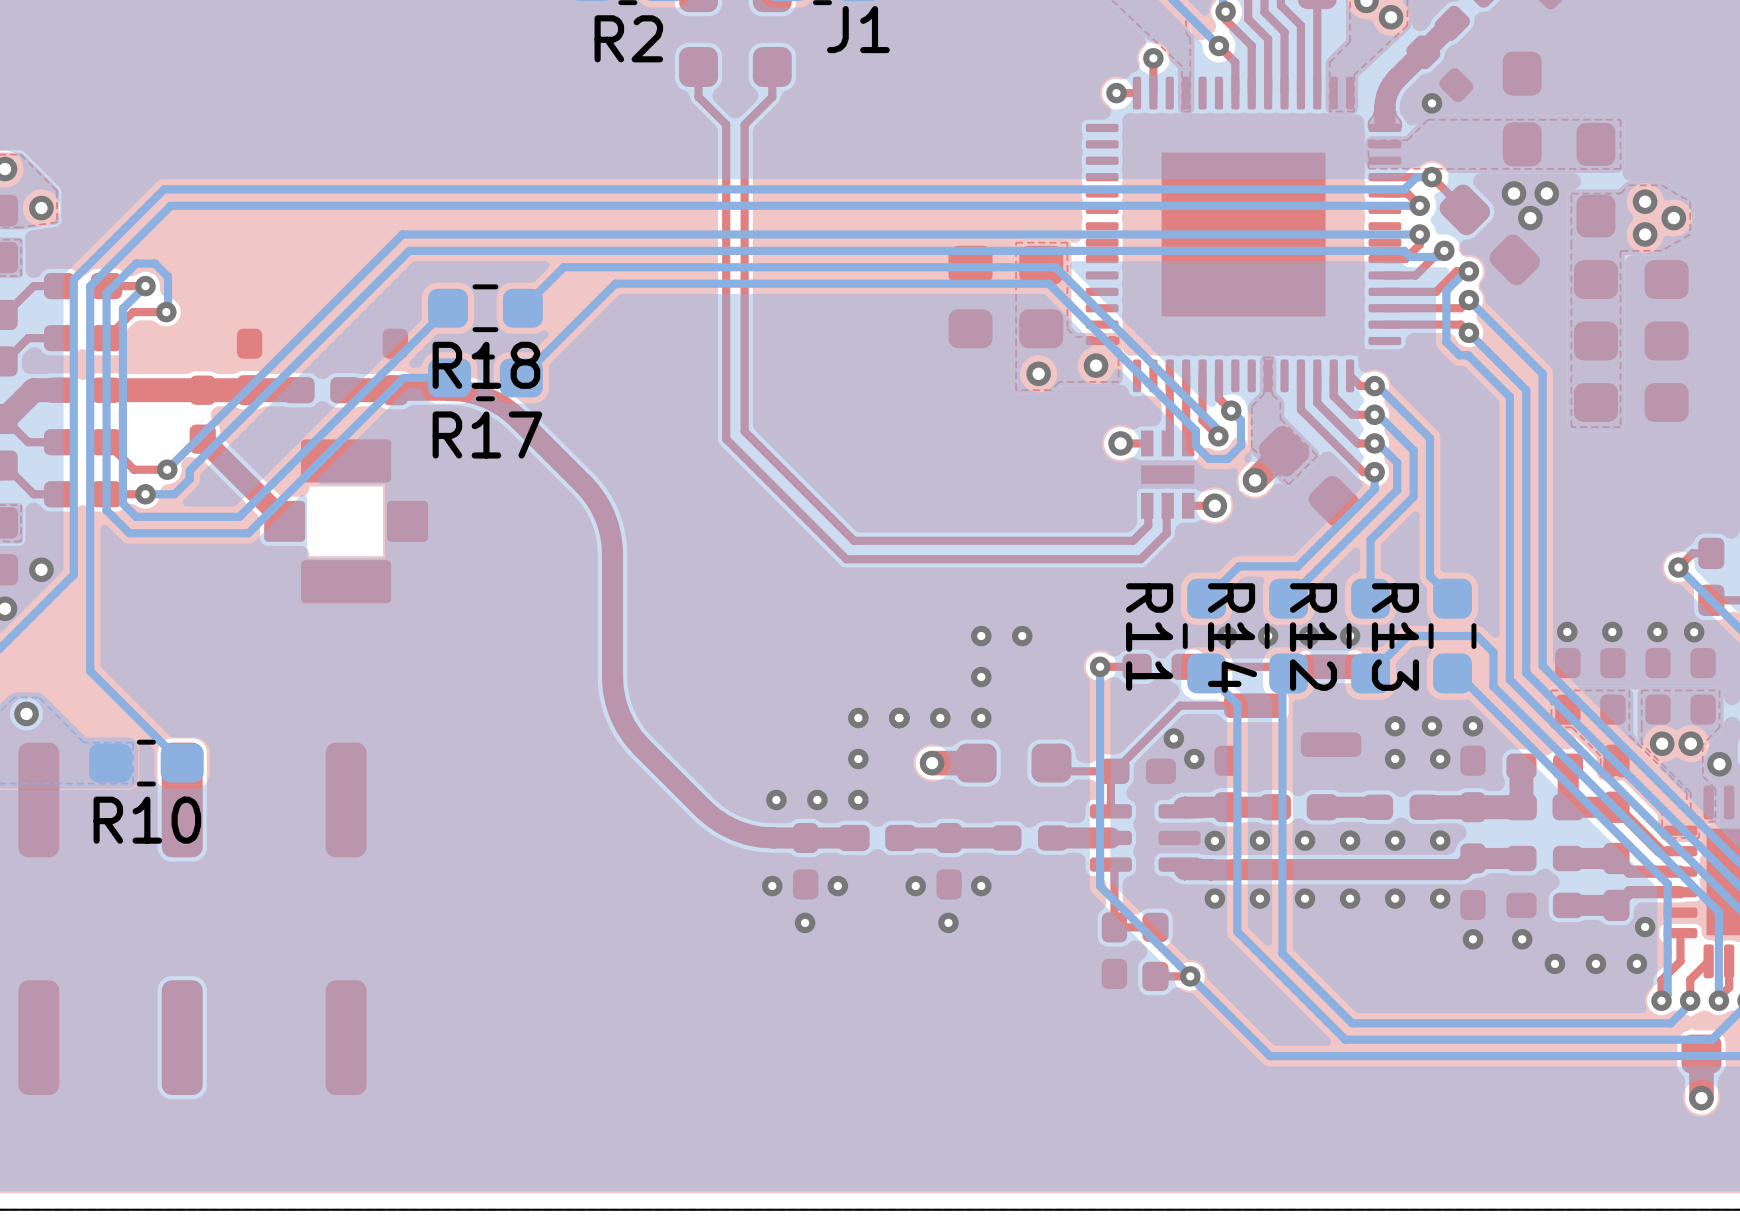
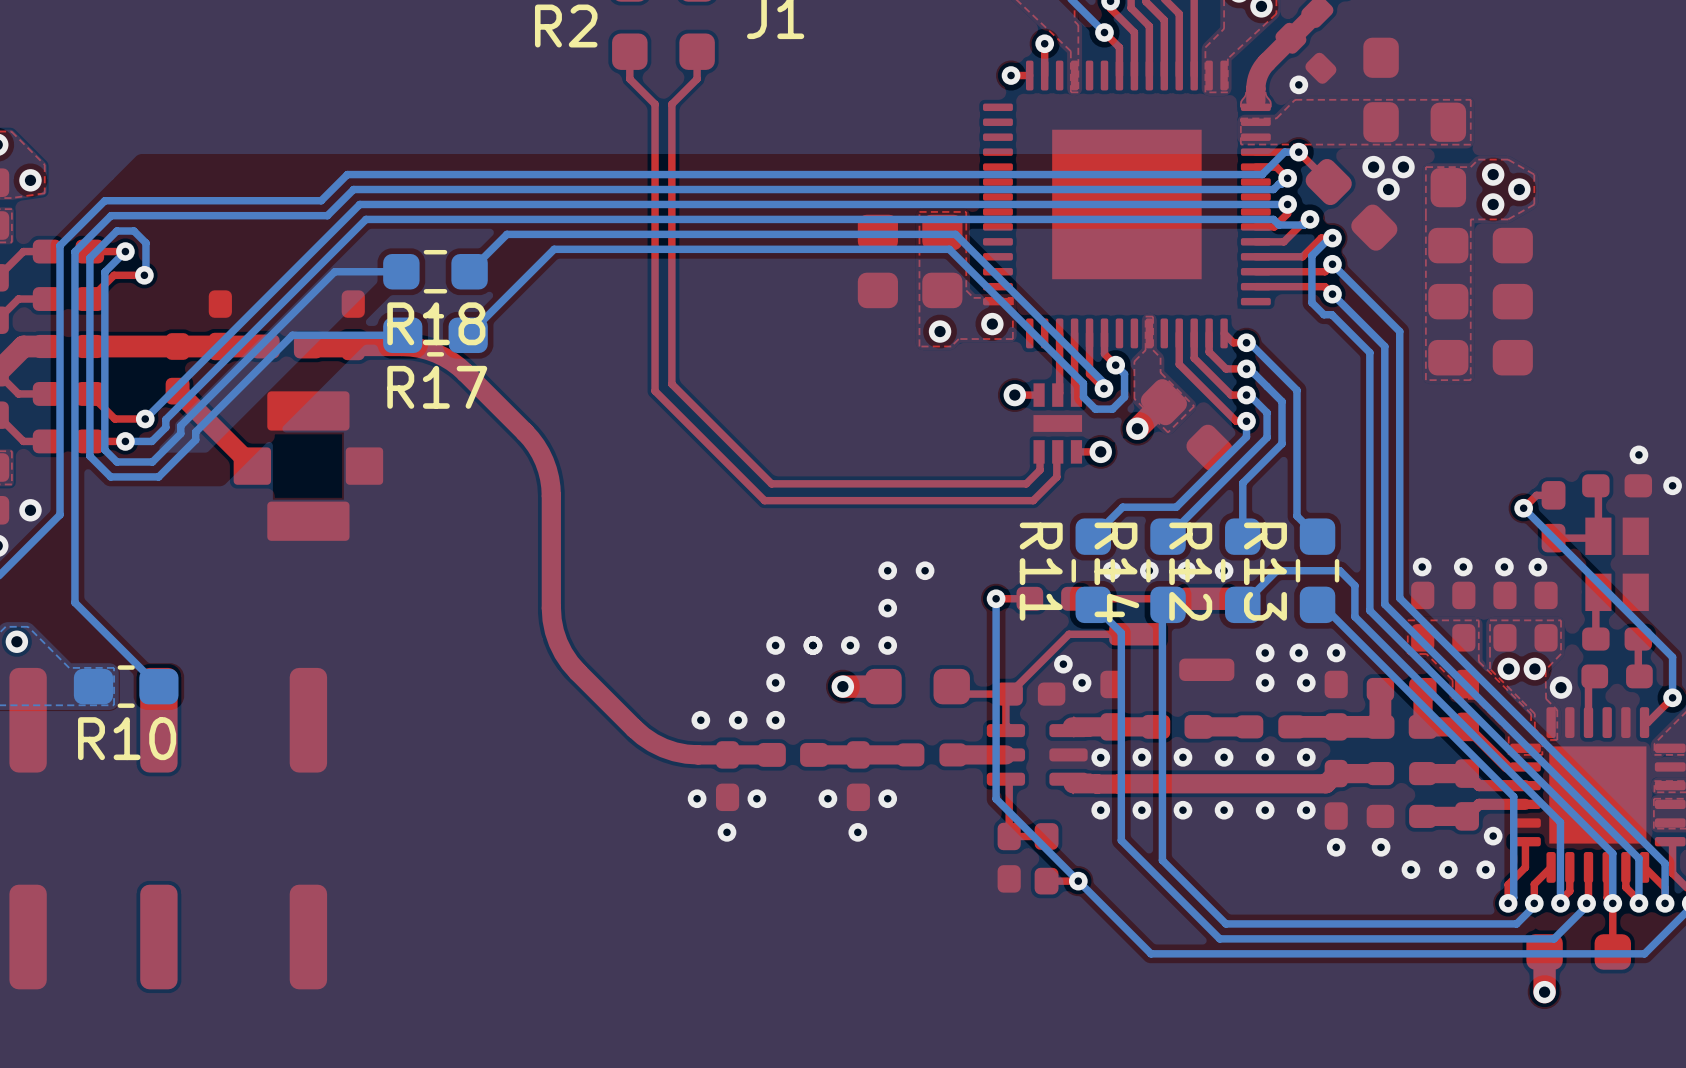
bottom track: (1404, 189) (163, 189) (122, 230) -> (1273, 163) (1262, 174) (347, 174) (321, 200) (104, 200)
bottom track: (1419, 205) (170, 205) (129, 246) -> (1287, 178) (1273, 189) (353, 189) (327, 215) (111, 215)
bottom track: (448, 308) (239, 516) (175, 516) -> (401, 271) (334, 271) (180, 425) (180, 433) (152, 461)
bottom track: (403, 377) (248, 533) (181, 533) -> (361, 335) (292, 335) (195, 431) (195, 439) (158, 476)

